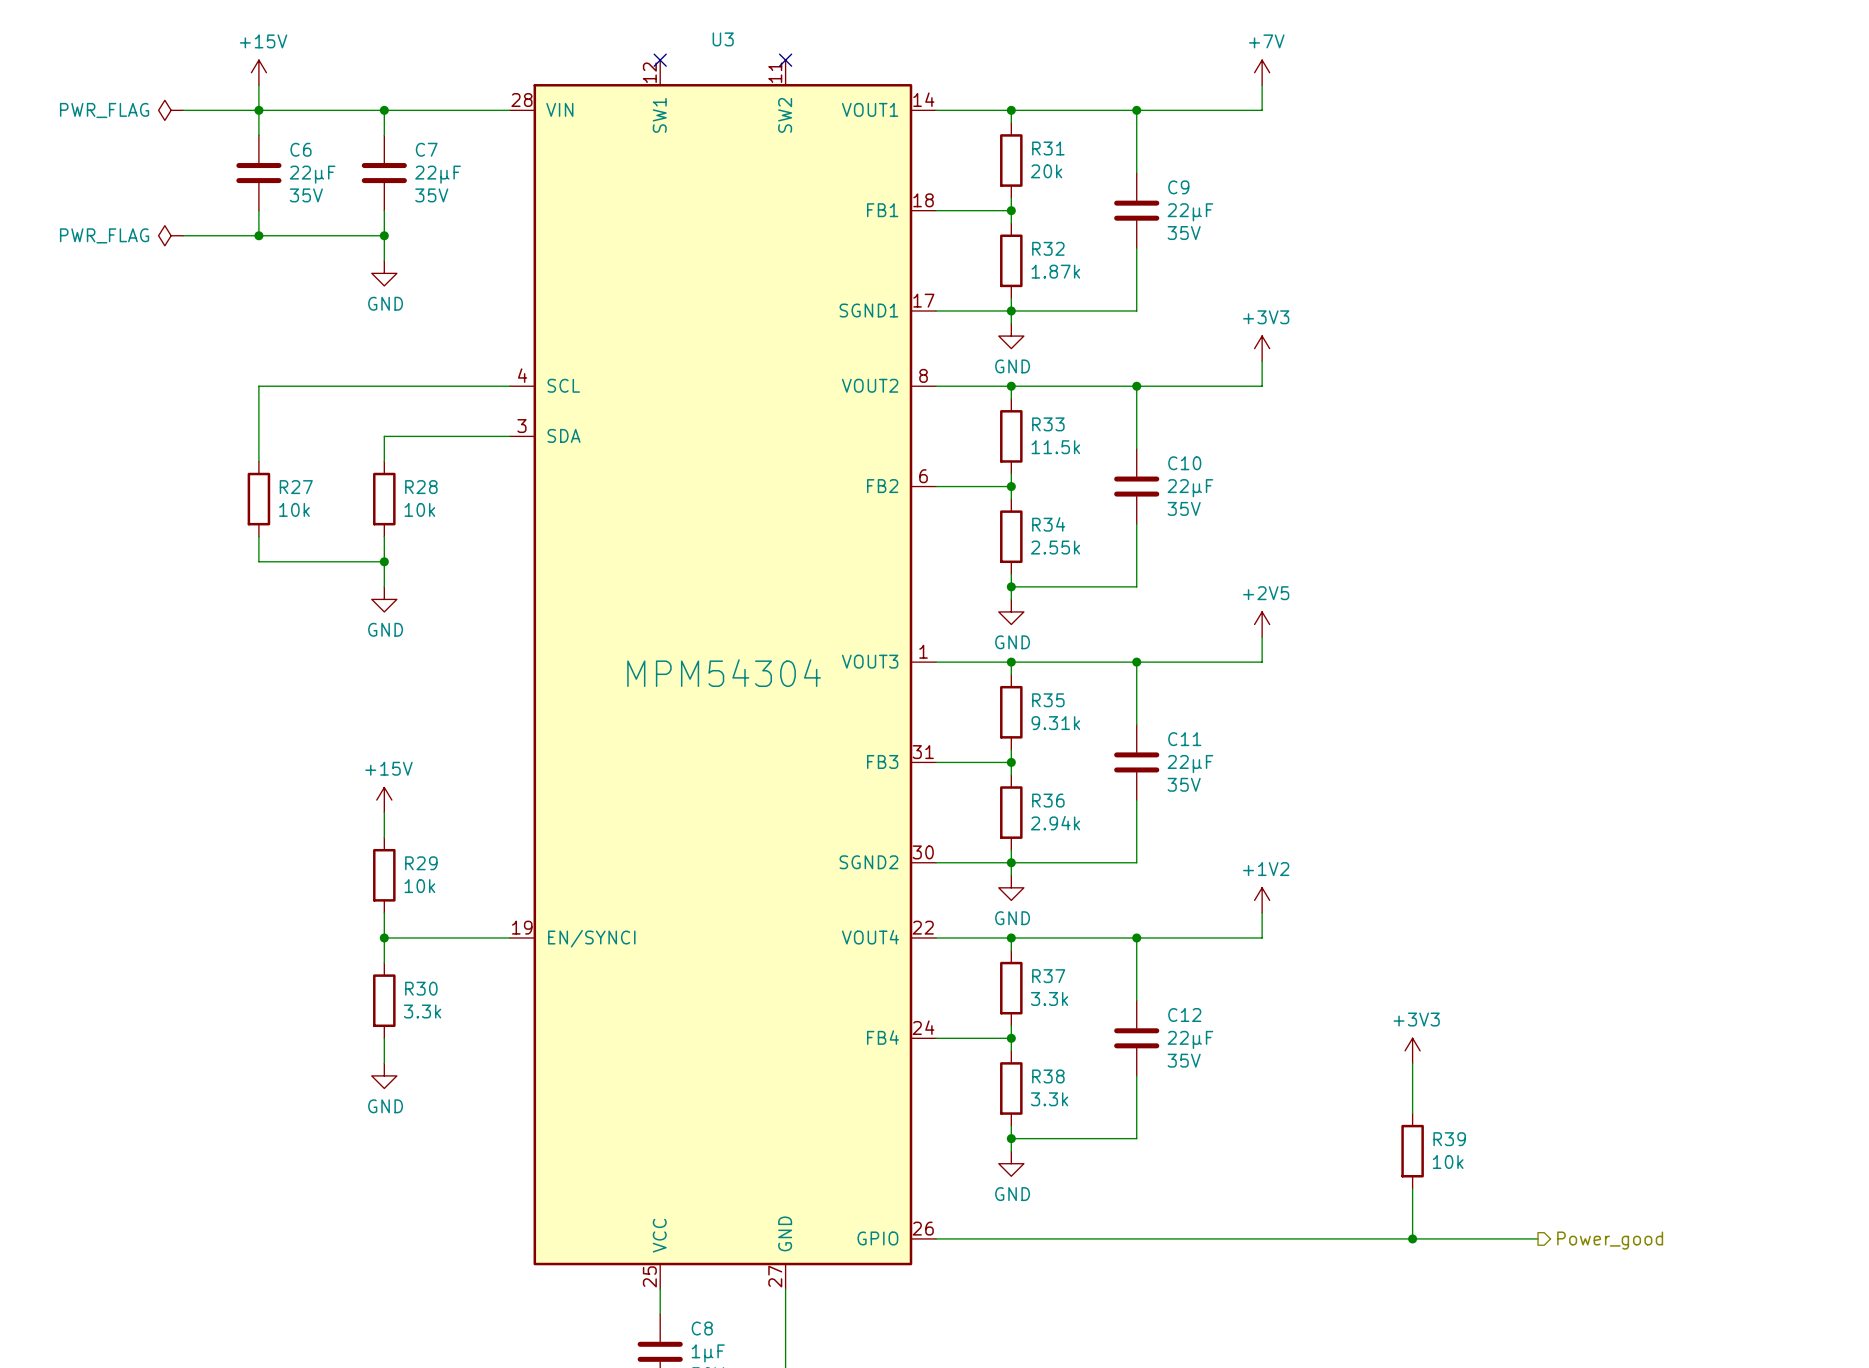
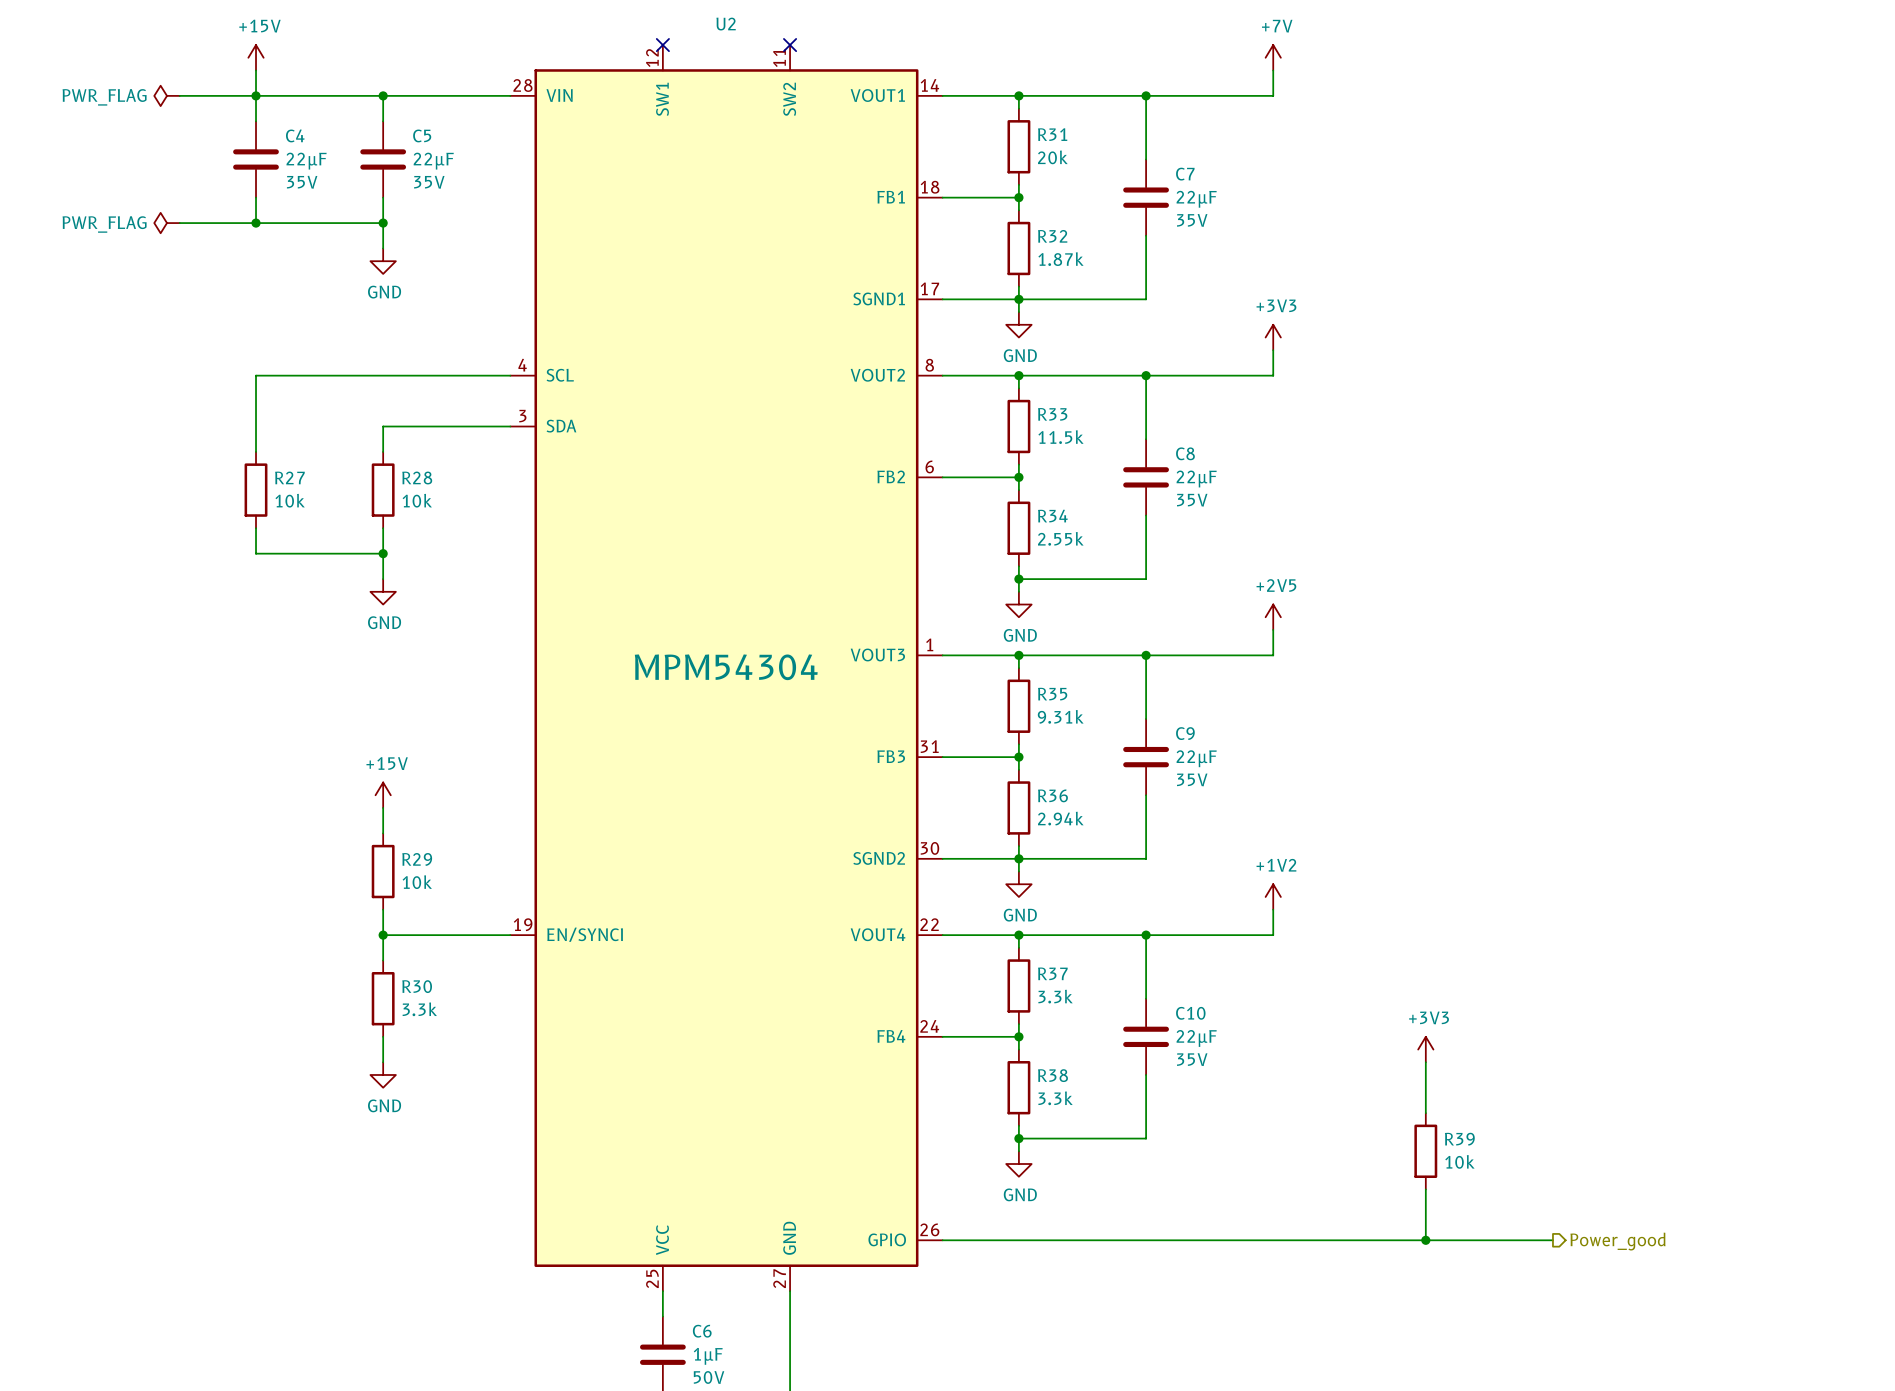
U3 name: U3 (723, 39) -> U2 (726, 24)
C6 name: C6 (300, 149) -> C4 (295, 135)
C7 name: C7 (426, 149) -> C5 (422, 135)
C9 name: C9 (1178, 187) -> C7 (1185, 174)
C10 name: C10 (1184, 463) -> C8 (1185, 453)
C11 name: C11 (1184, 739) -> C9 (1185, 733)
C12 name: C12 (1184, 1015) -> C10 (1190, 1013)
C8 name: C8 (702, 1328) -> C6 (702, 1331)

